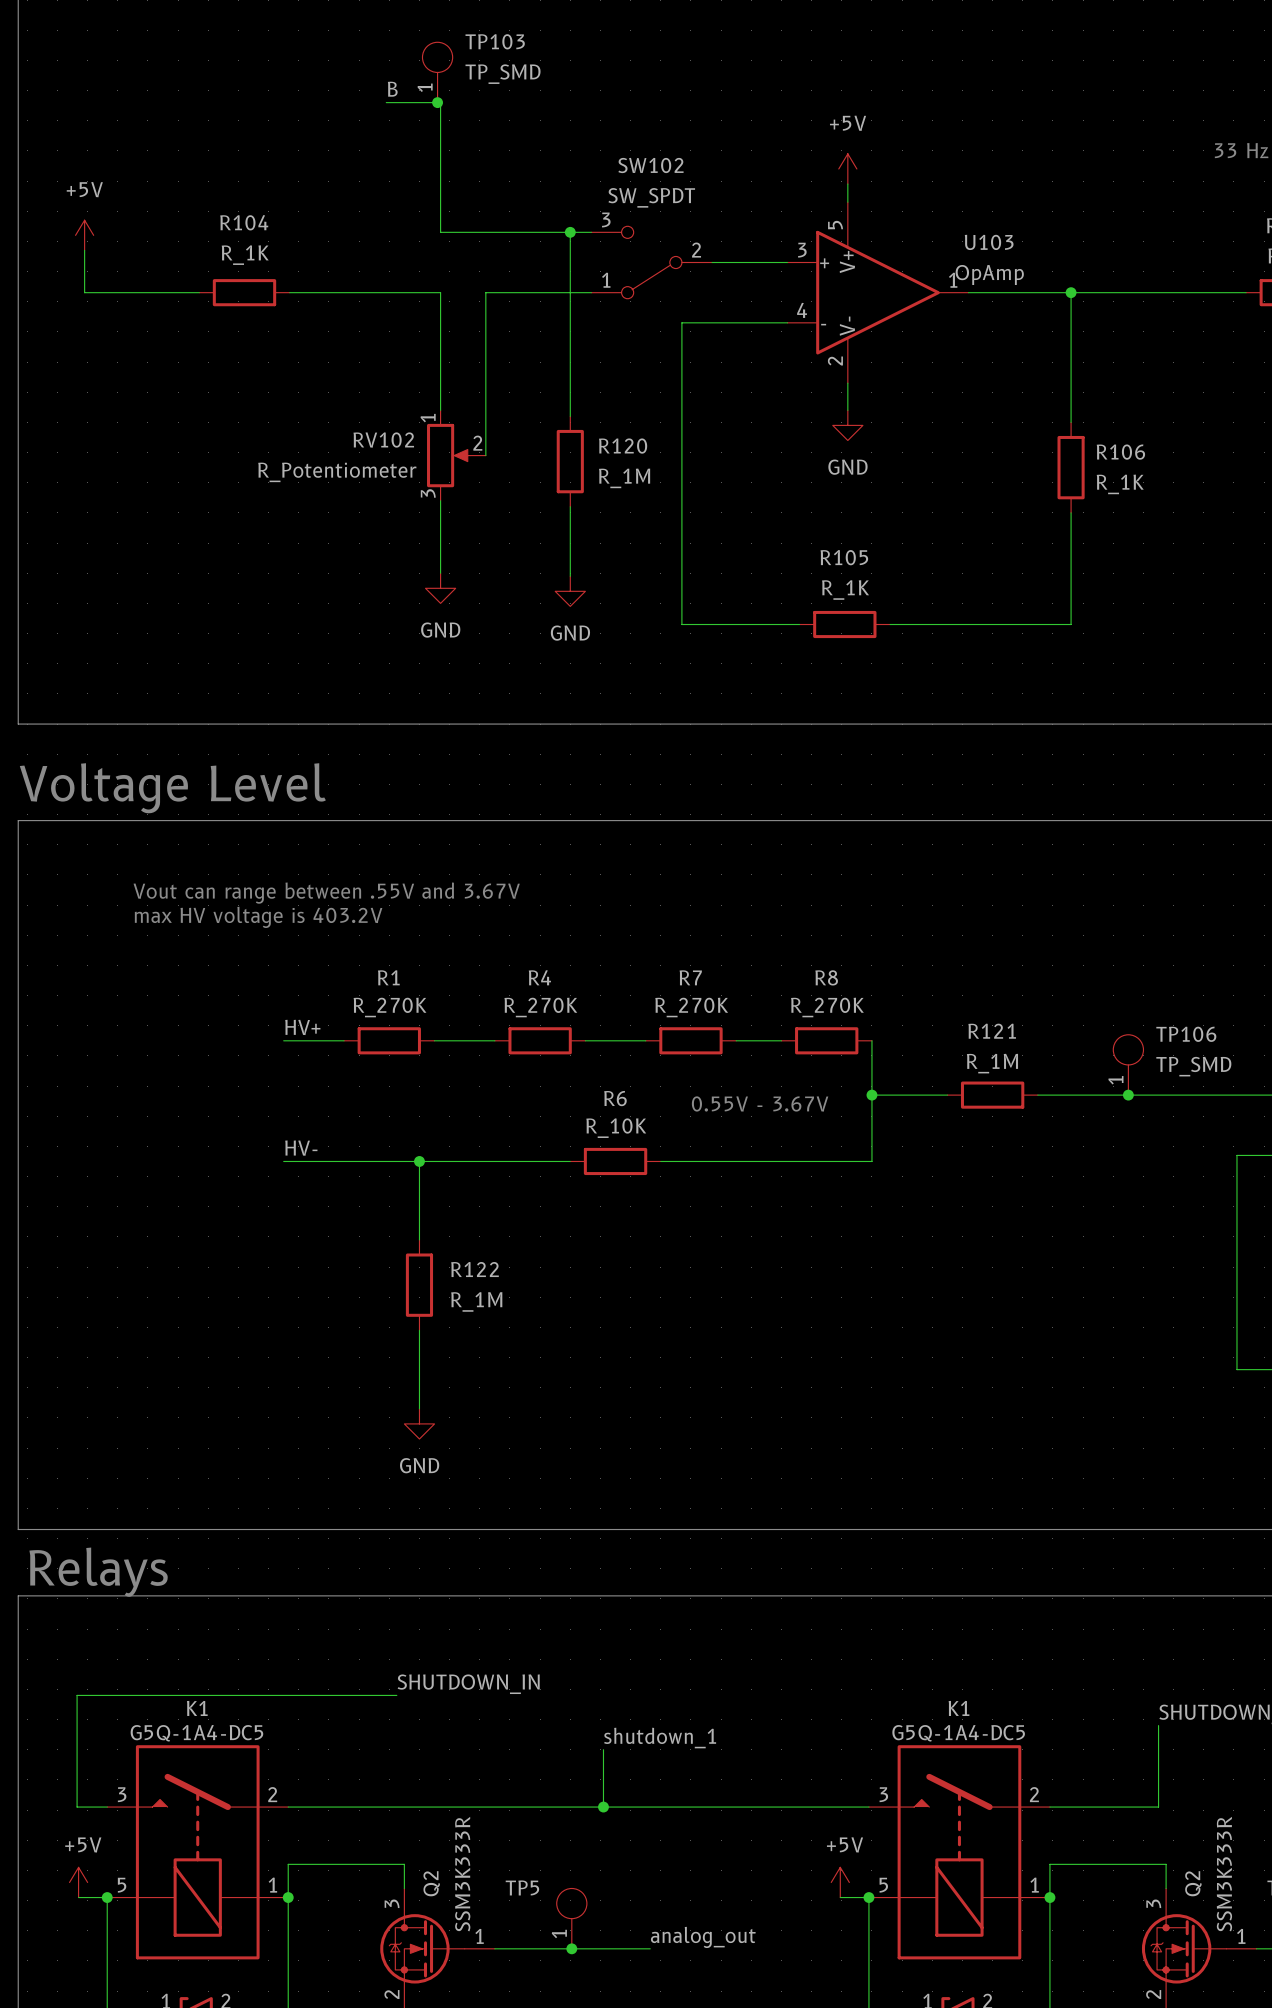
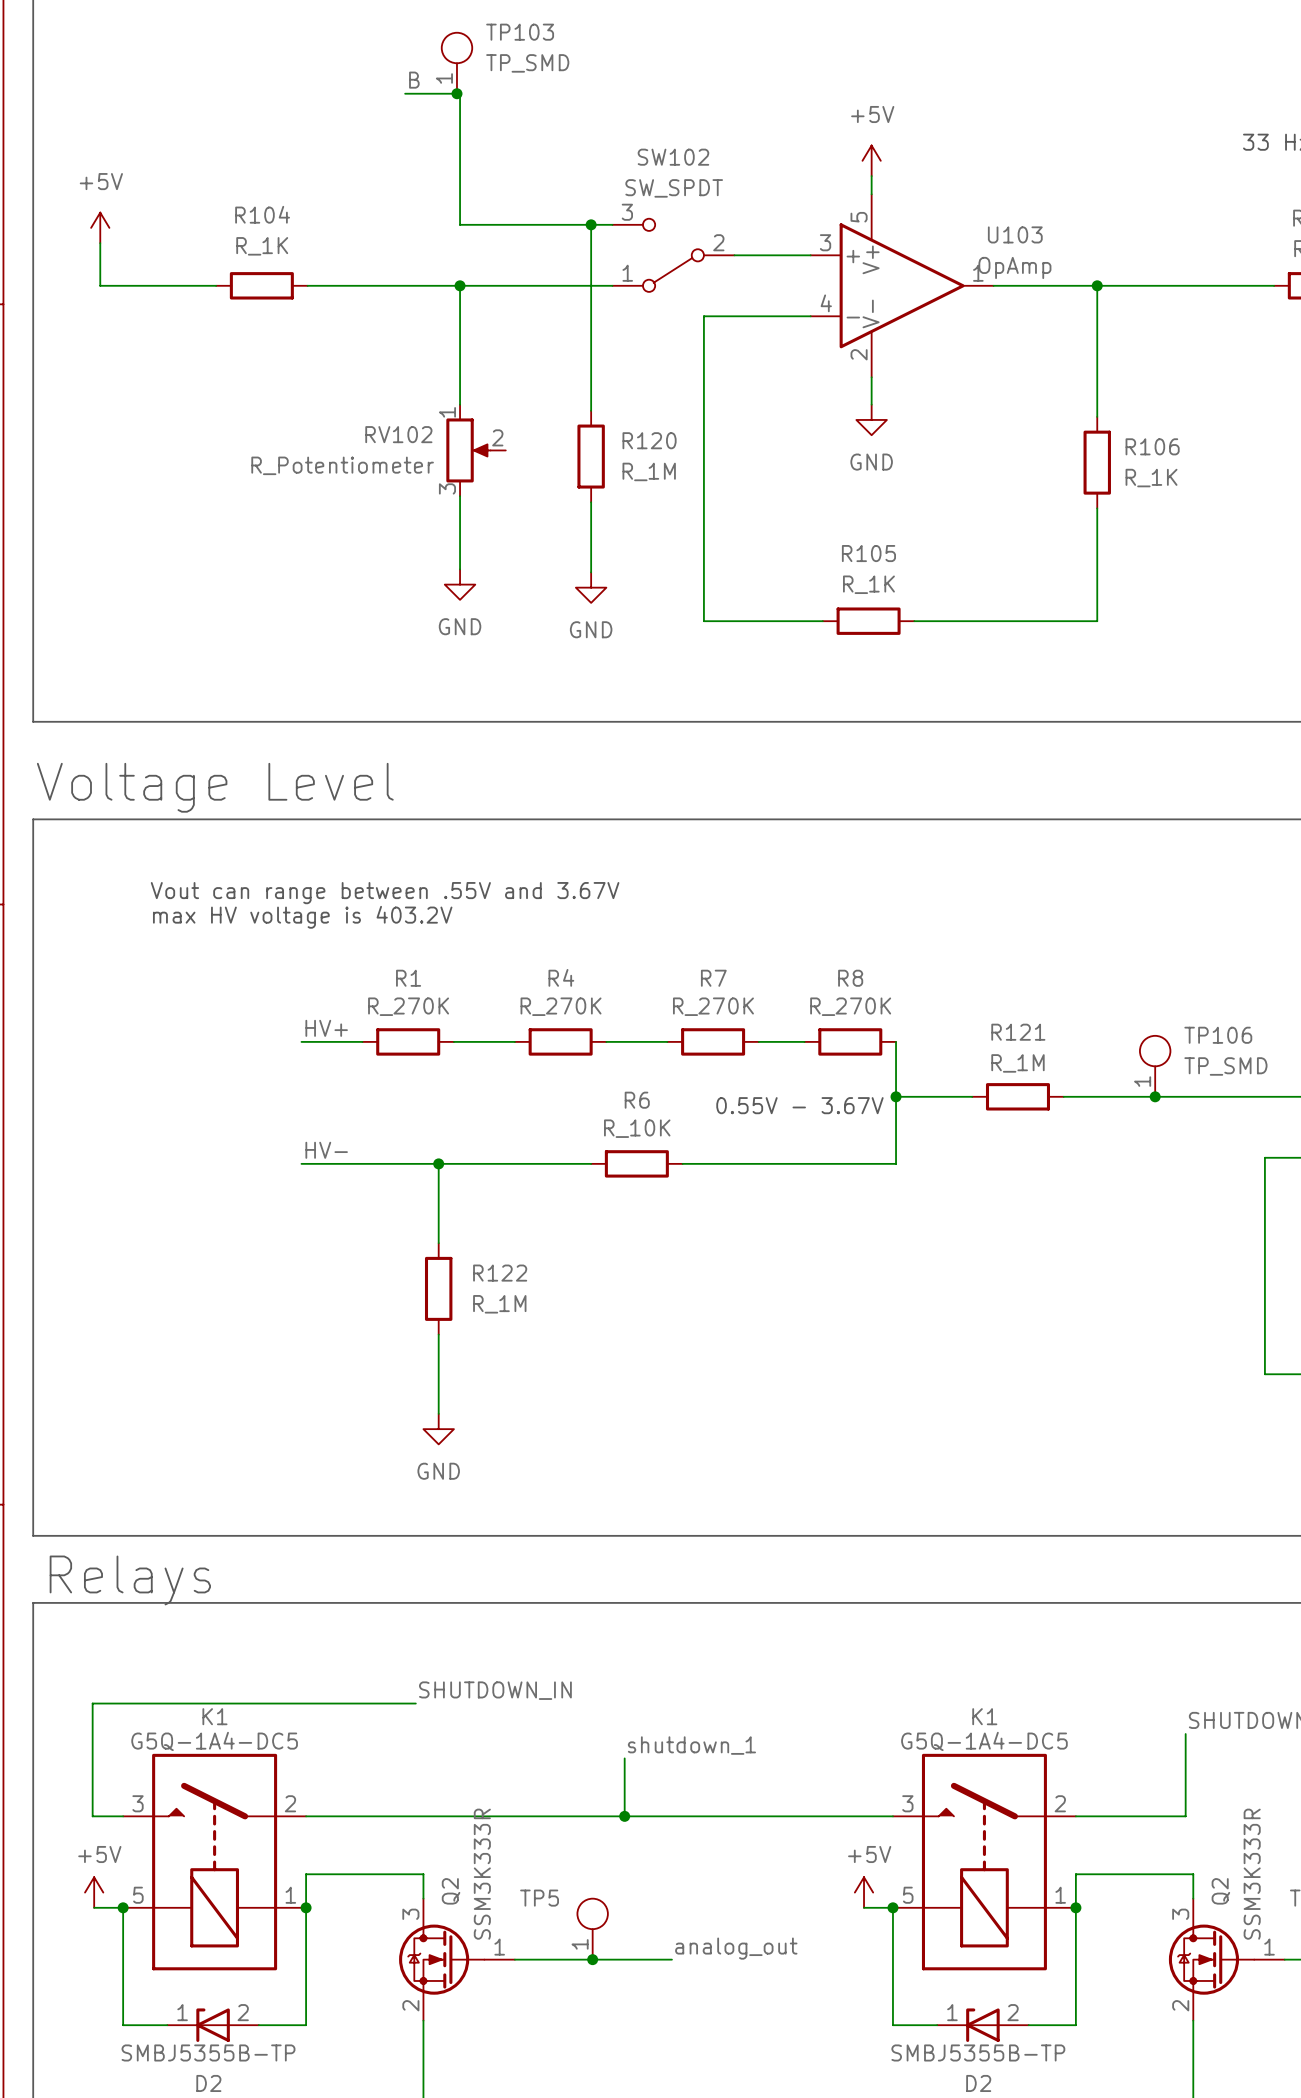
junction: none -> (460, 285)
wire: (485, 292) (485, 455) -> (505, 285) (460, 285)

